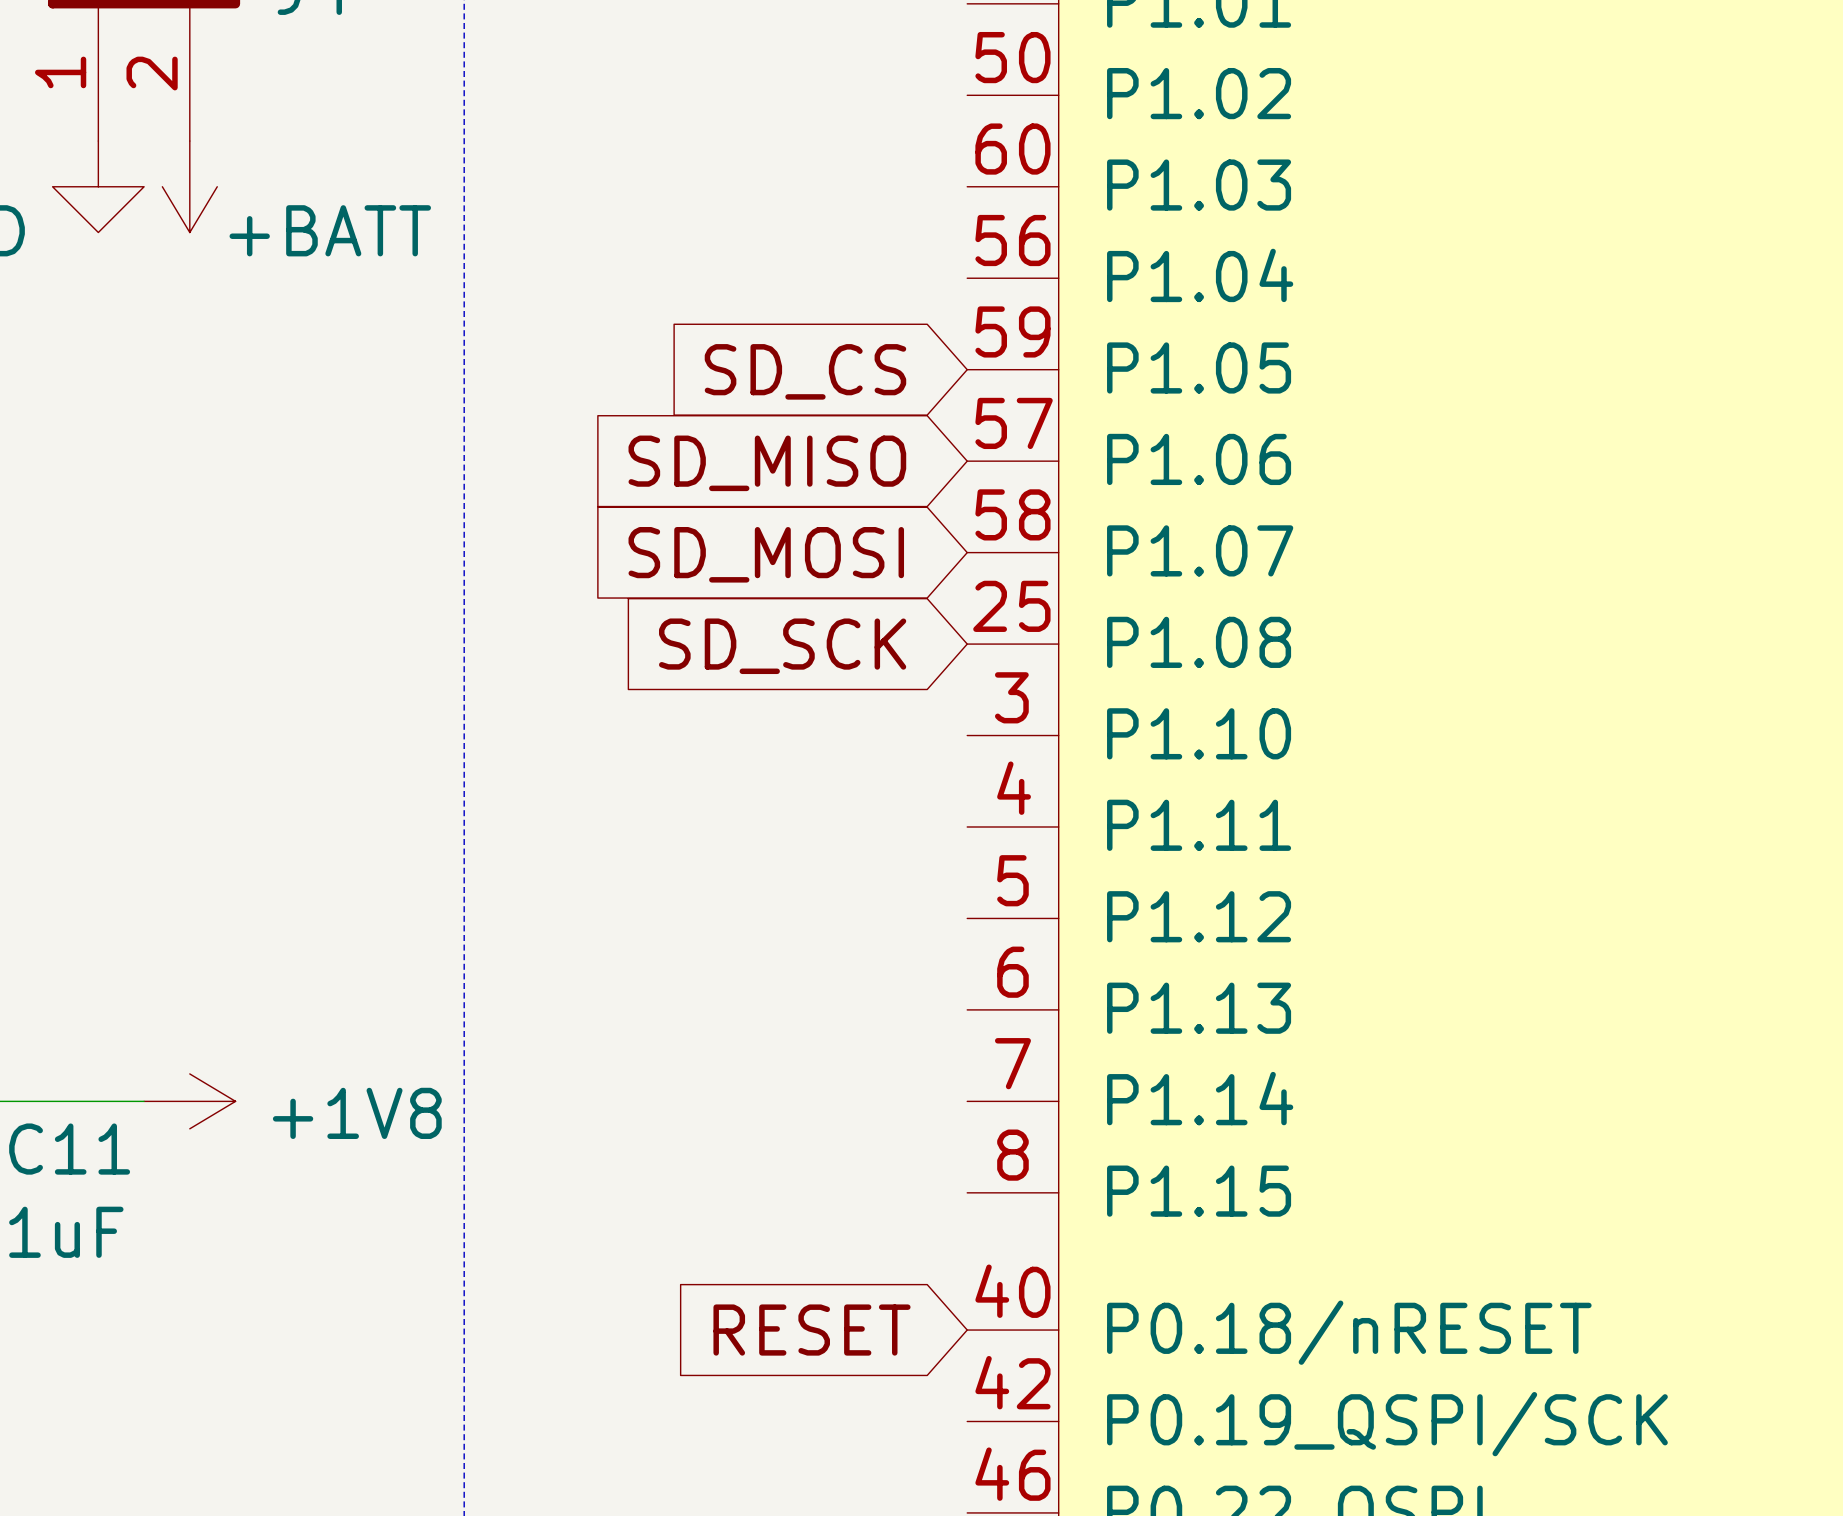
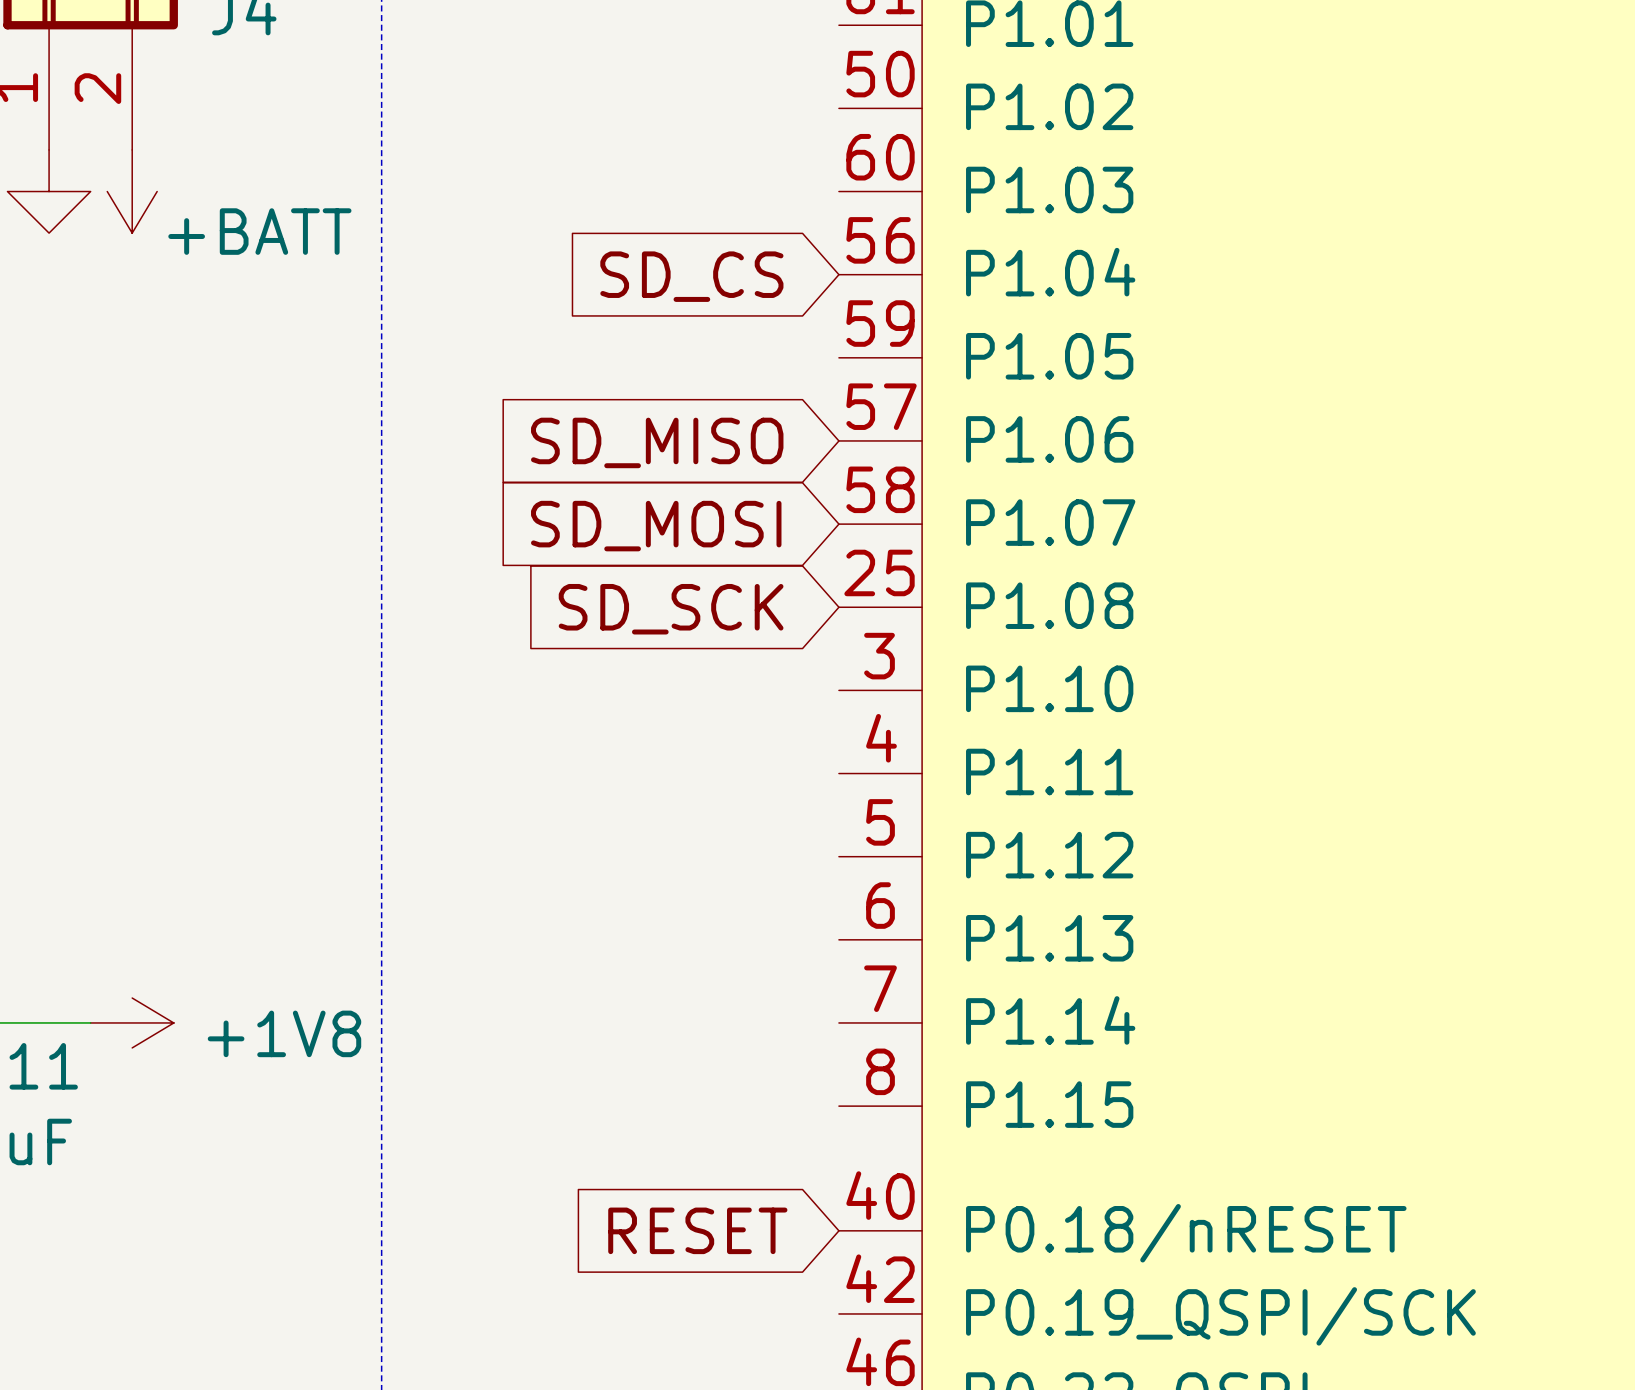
global label position: SD_CS (805, 371) -> SD_CS (691, 276)

